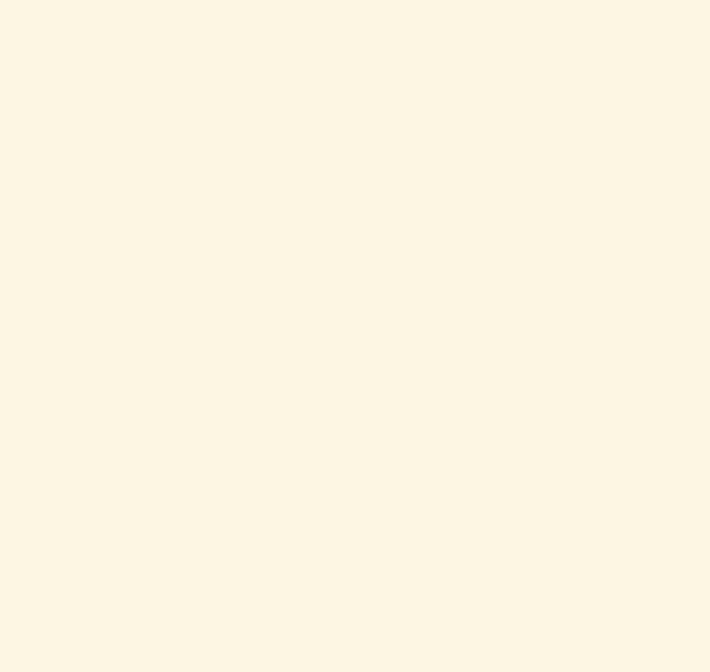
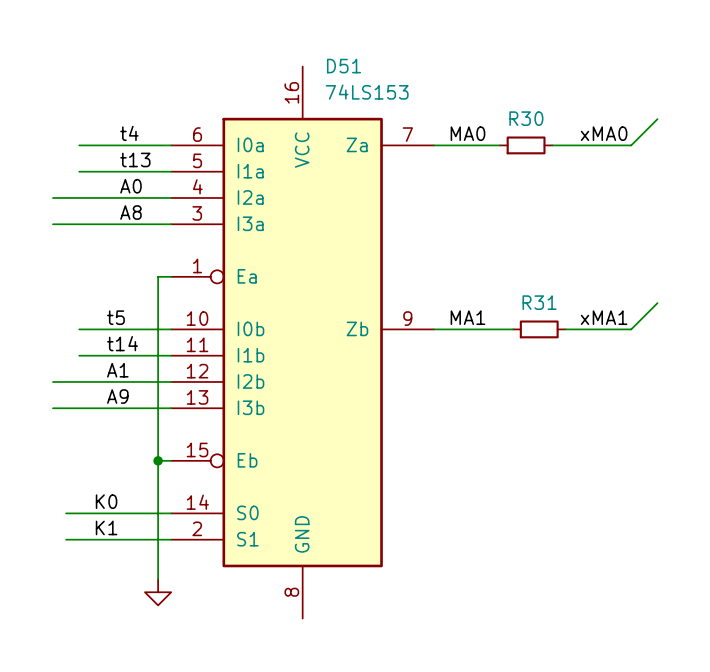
wire: none -> (657, 119) (631, 145) (552, 145)
label: none -> t4 (129, 133)
label: none -> MA0 (467, 133)
label: none -> xMA0 (604, 133)
wire: none -> (79, 145) (171, 145)
wire: none -> (434, 145) (499, 145)
R30: none -> (526, 145)
label: none -> t13 (135, 159)
wire: none -> (79, 171) (171, 171)
label: none -> A0 (130, 186)
wire: none -> (52, 197) (171, 197)
label: none -> A8 (130, 212)
wire: none -> (52, 224) (171, 224)
wire: none -> (171, 276) (158, 276) (158, 579)
wire: none -> (657, 303) (631, 329) (565, 329)
label: none -> t5 (115, 317)
label: none -> MA1 (467, 317)
label: none -> xMA1 (604, 317)
wire: none -> (79, 329) (171, 329)
wire: none -> (434, 329) (512, 329)
R31: none -> (539, 329)
D51: none -> 74LS153 (302, 342)
label: none -> t14 (122, 343)
wire: none -> (79, 355) (171, 355)
label: none -> A1 (117, 370)
wire: none -> (52, 381) (171, 381)
label: none -> A9 (117, 396)
wire: none -> (52, 408) (171, 408)
wire: none -> (158, 460) (171, 460)
junction: none -> (158, 460)
label: none -> K0 (106, 501)
wire: none -> (66, 513) (171, 513)
label: none -> K1 (106, 527)
wire: none -> (66, 539) (171, 539)
power symbol: none -> (158, 592)

